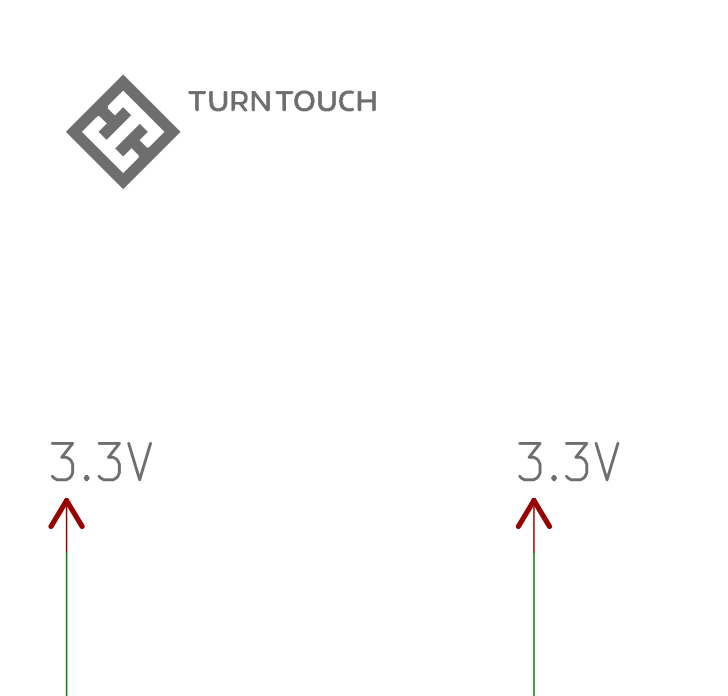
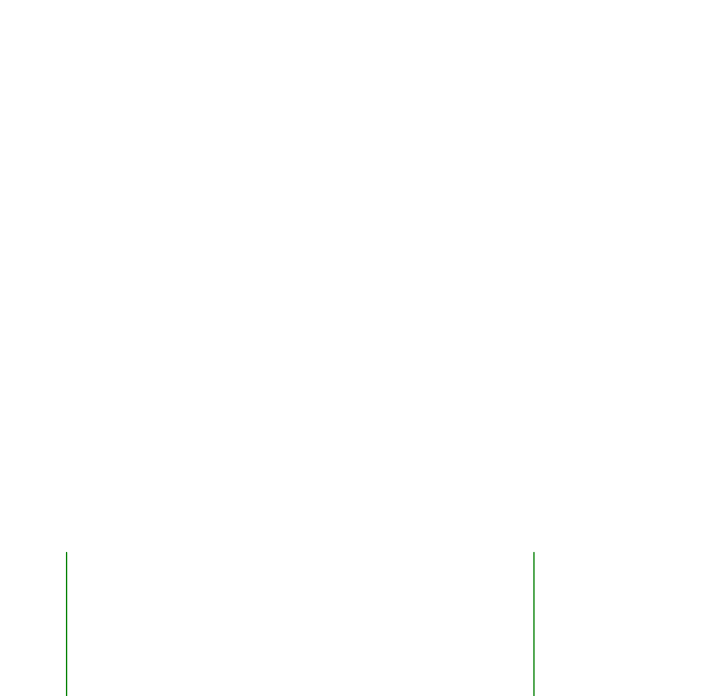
part: (221, 131) -> none
power symbol: 3.3V (66, 525) -> none
power symbol: 3.3V (533, 525) -> none

